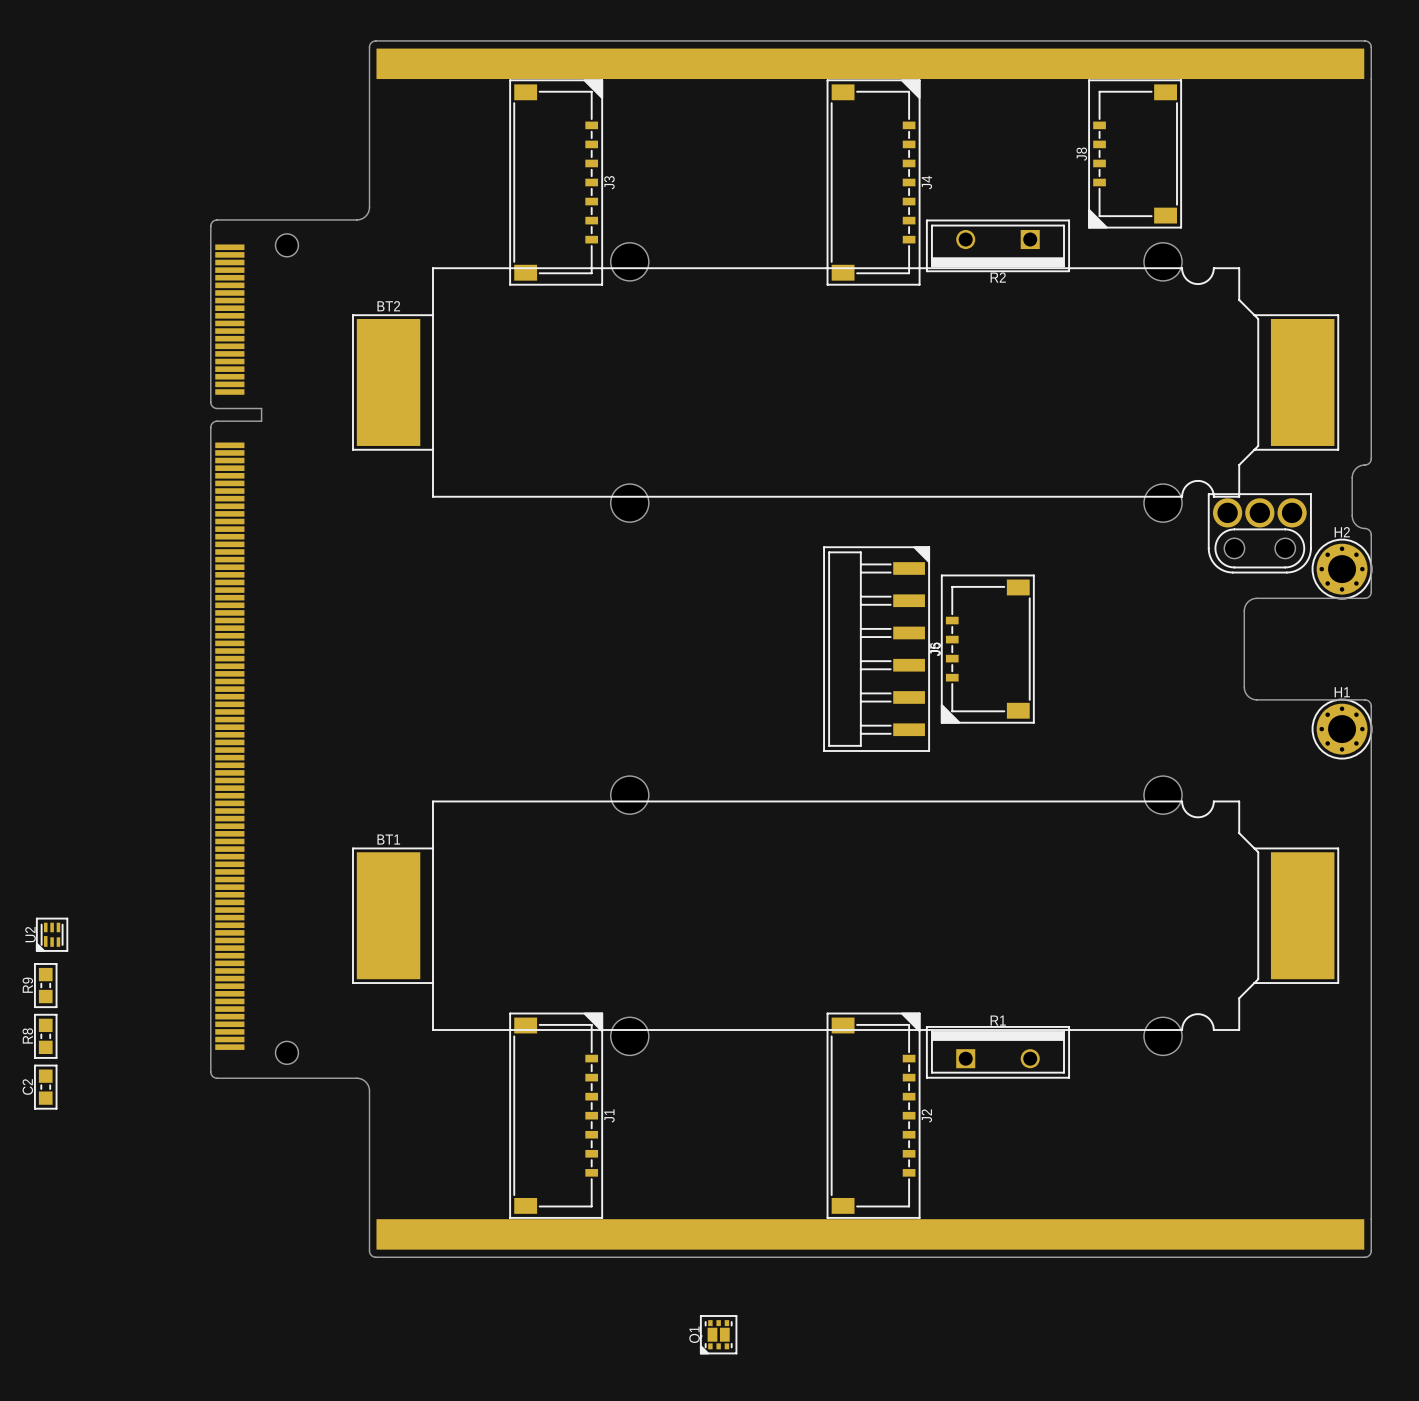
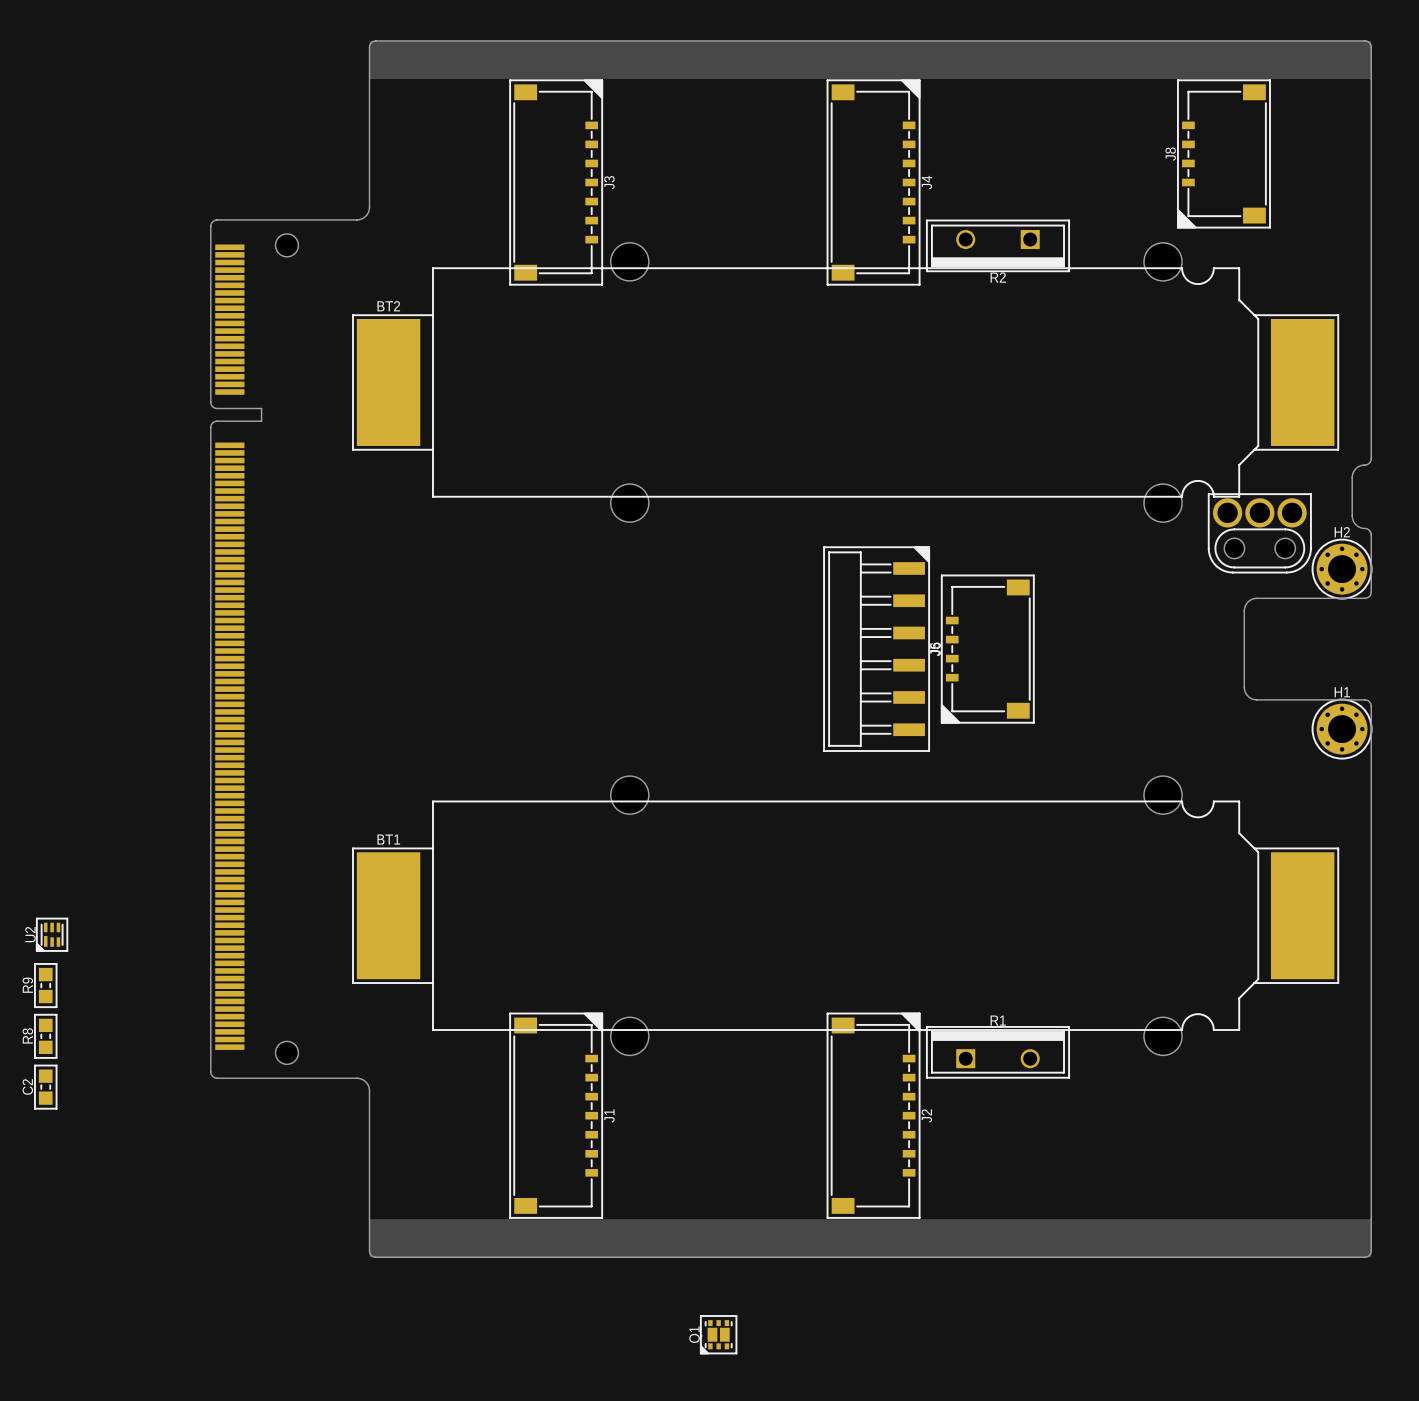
part footprint: [210, 40, 1372, 1258] -> [210, 40, 1372, 1258]
J8 position: (1135, 153) -> (1223, 153)

